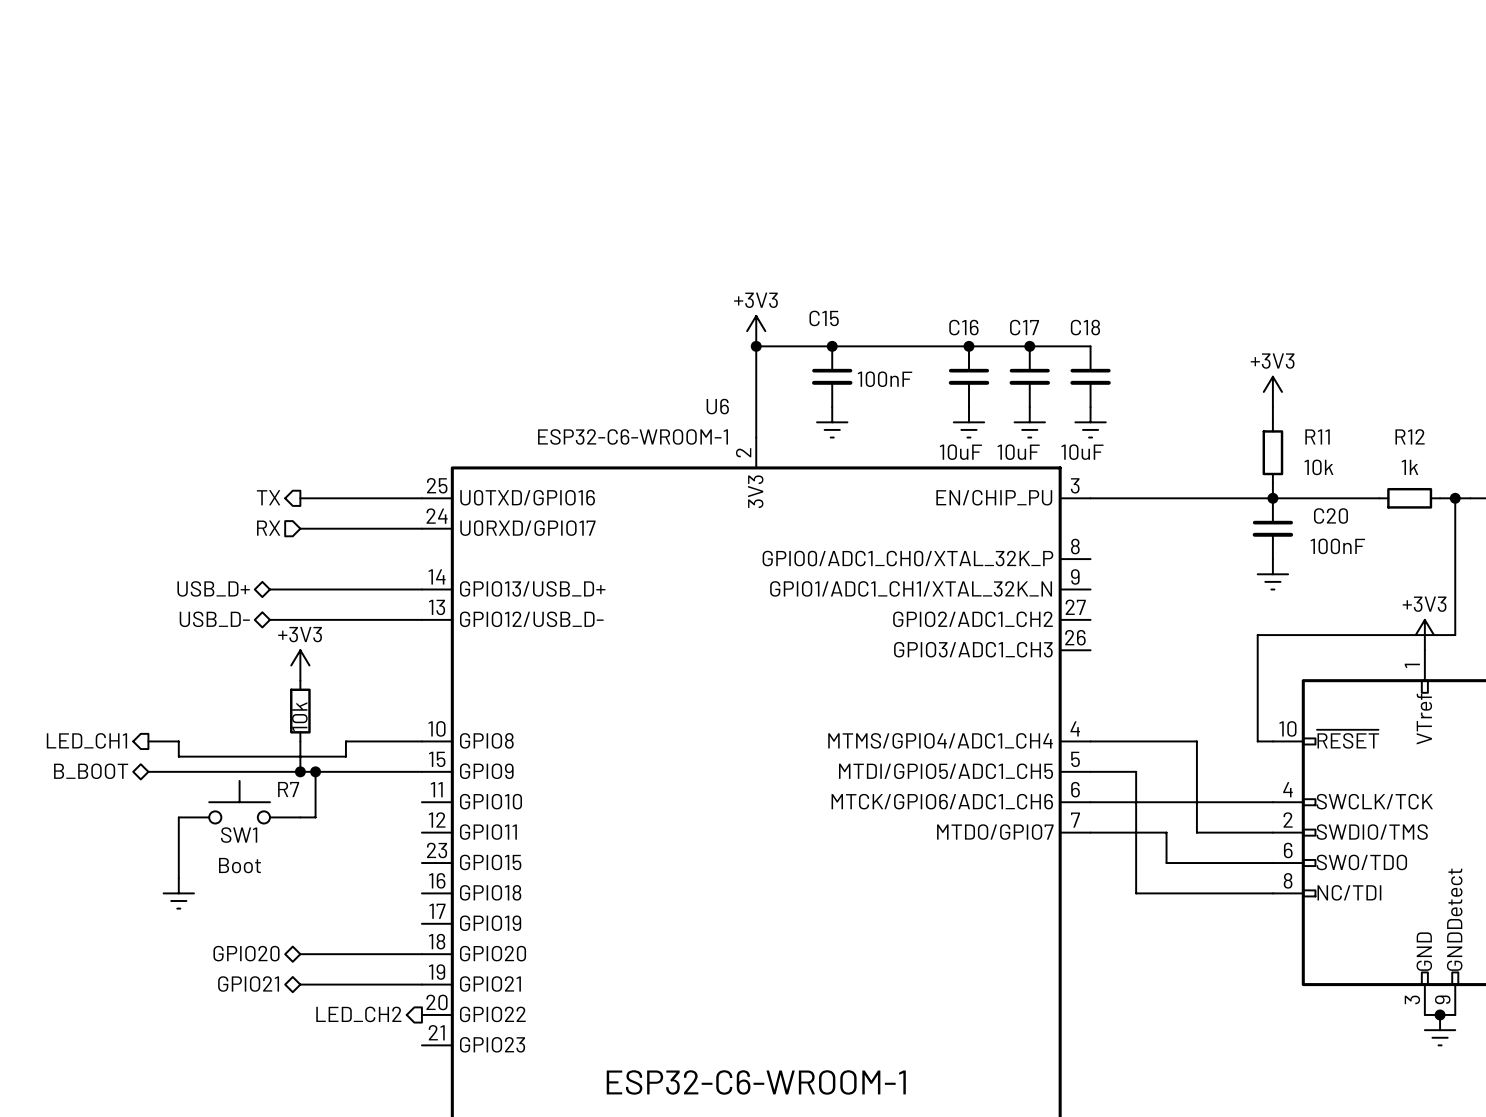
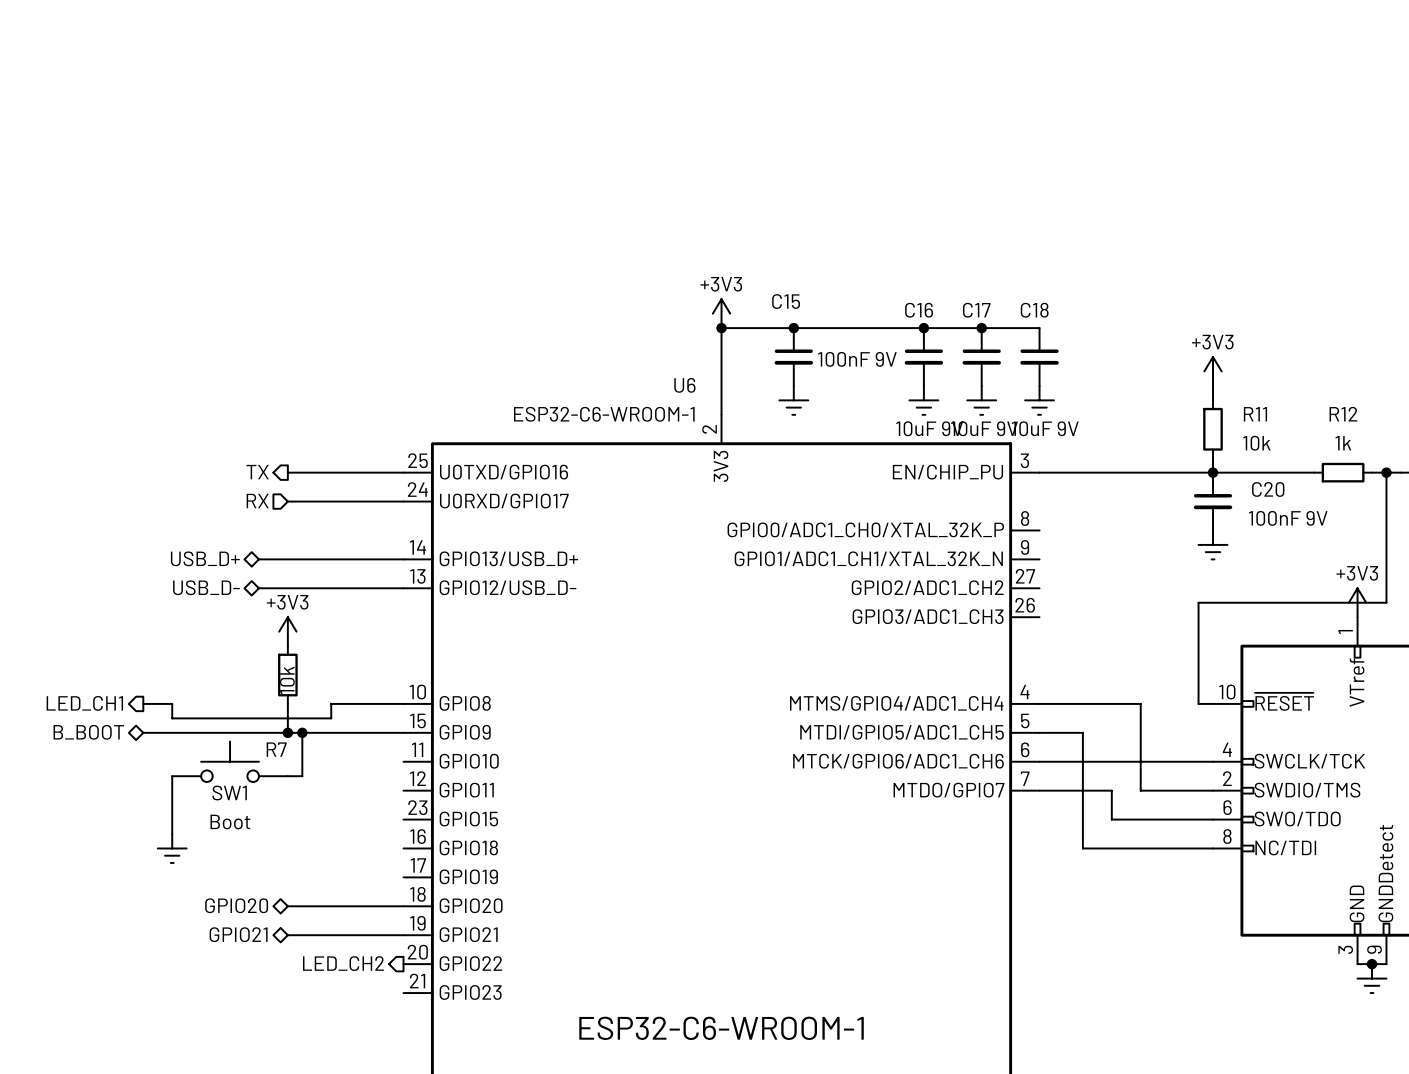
C15 value: 100nF (885, 379) -> 100nF 9V (857, 359)
C16 value: 10uF (960, 452) -> 10uF 9V (929, 428)
C17 value: 10uF (1018, 452) -> 10uF 9V (984, 428)
C18 value: 10uF (1082, 452) -> 10uF 9V (1045, 428)
C20 value: 100nF (1337, 546) -> 100nF 9V (1288, 518)

